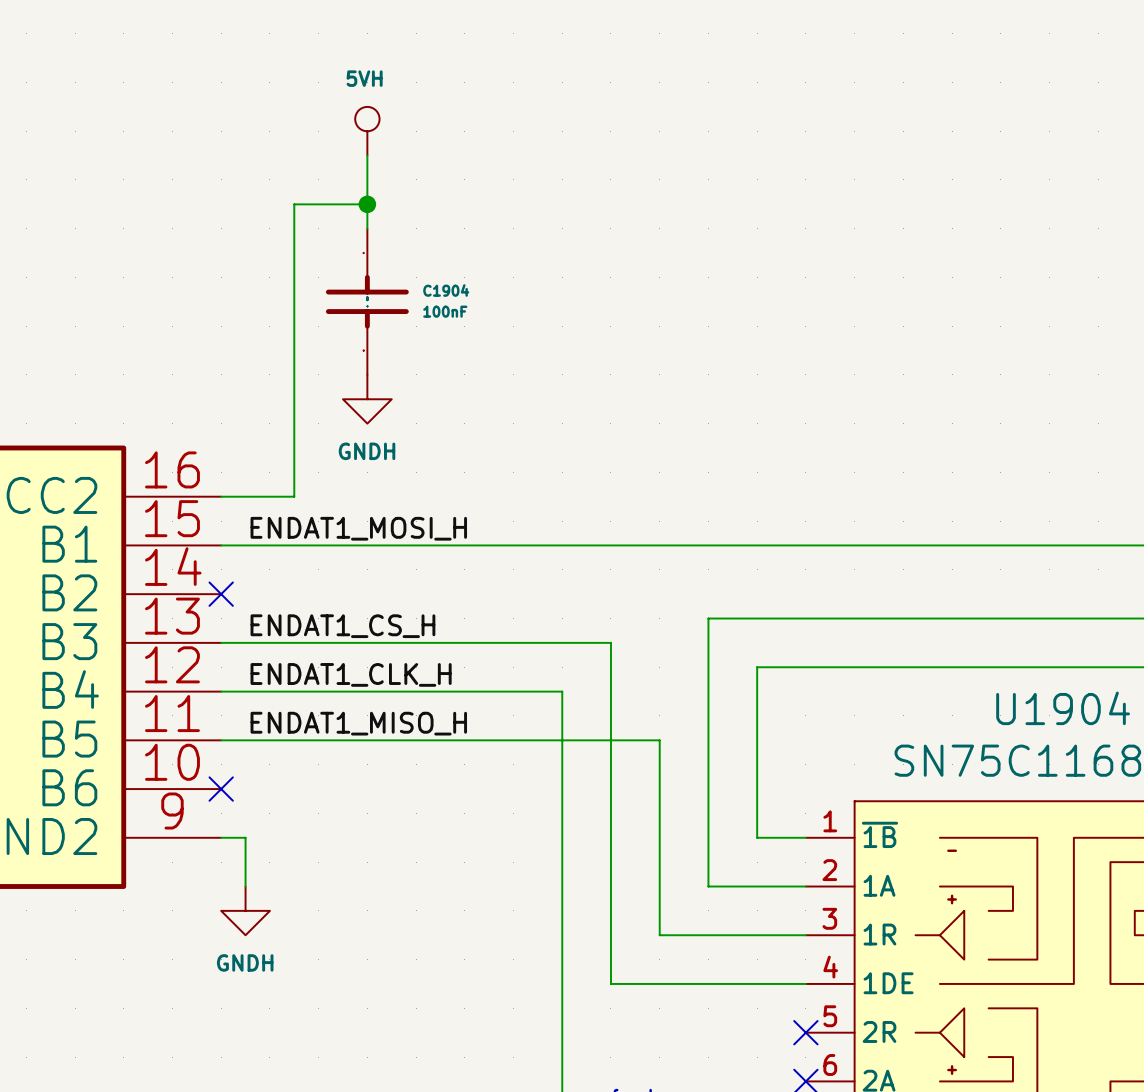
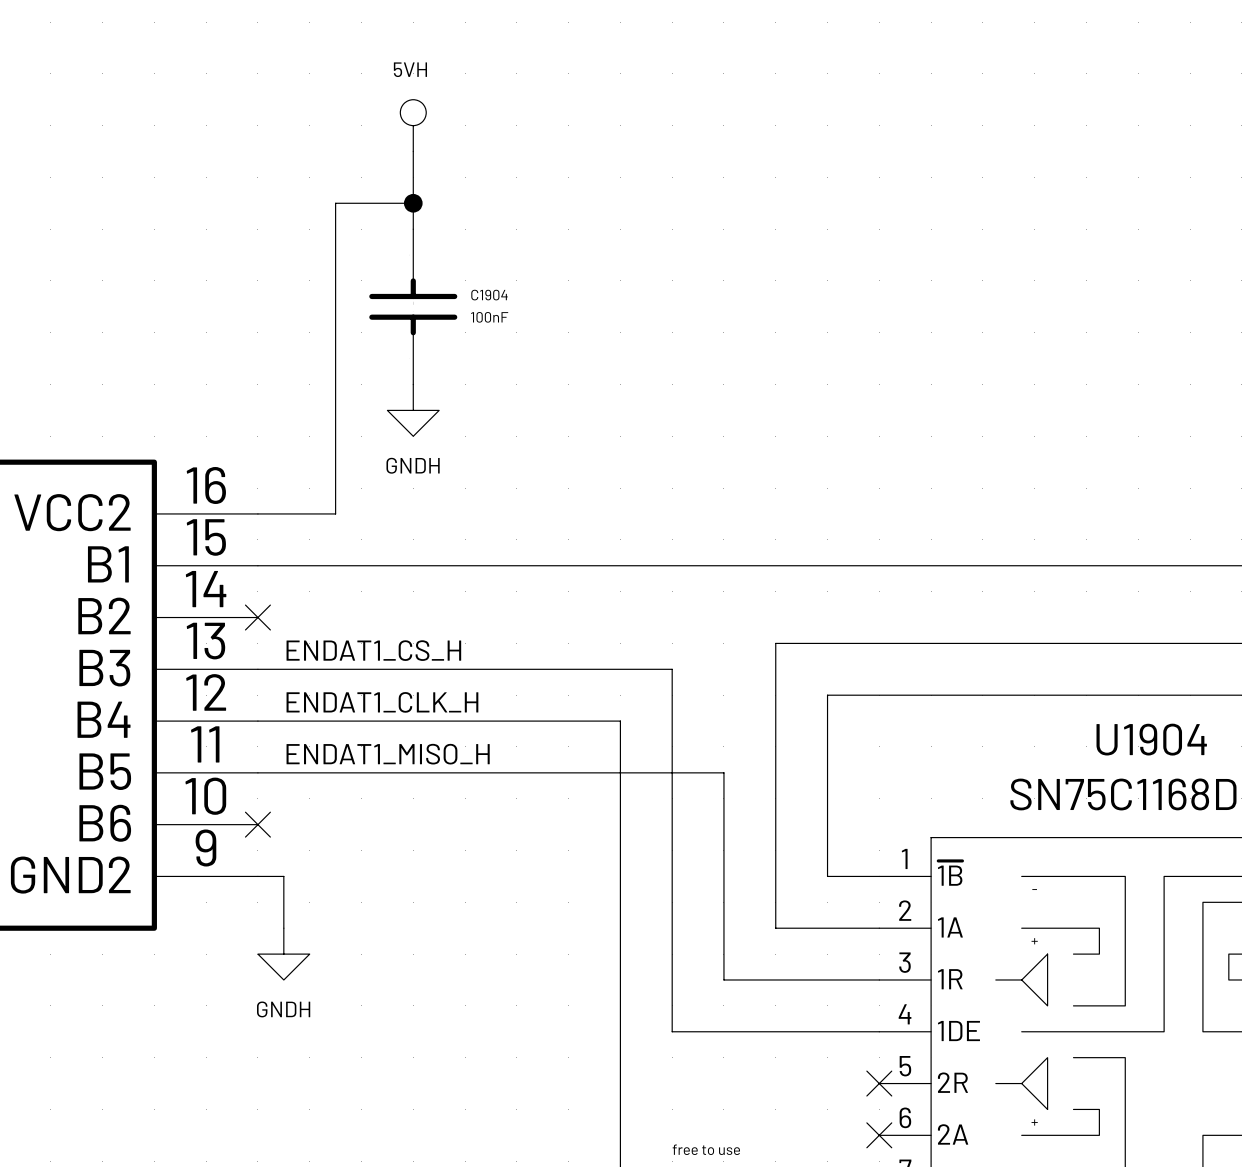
label: ENDAT1_MOSI_H (358, 528) -> none

